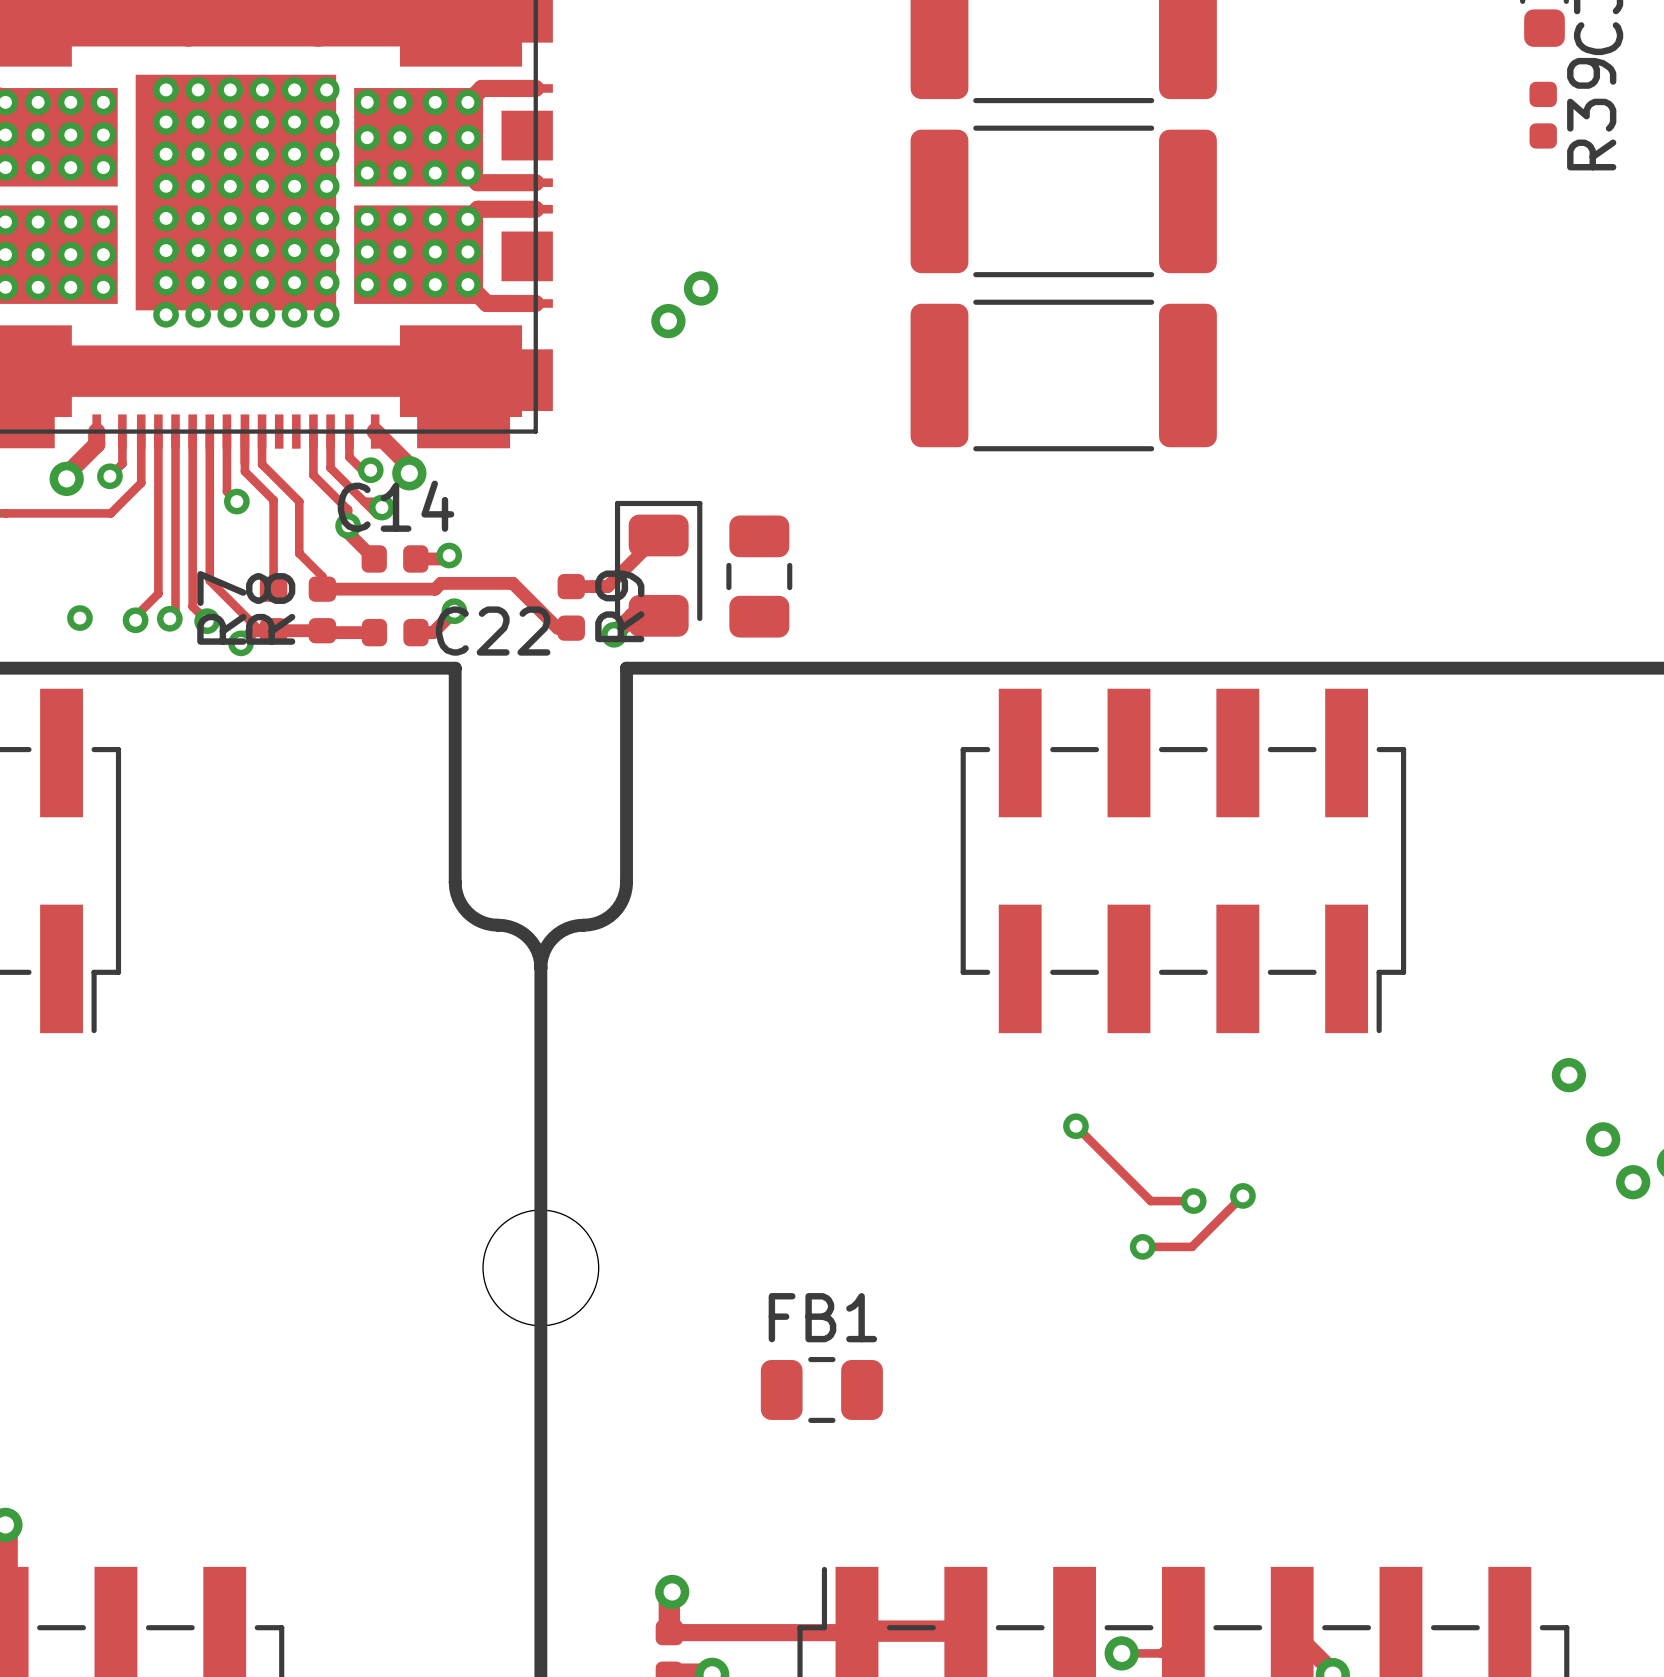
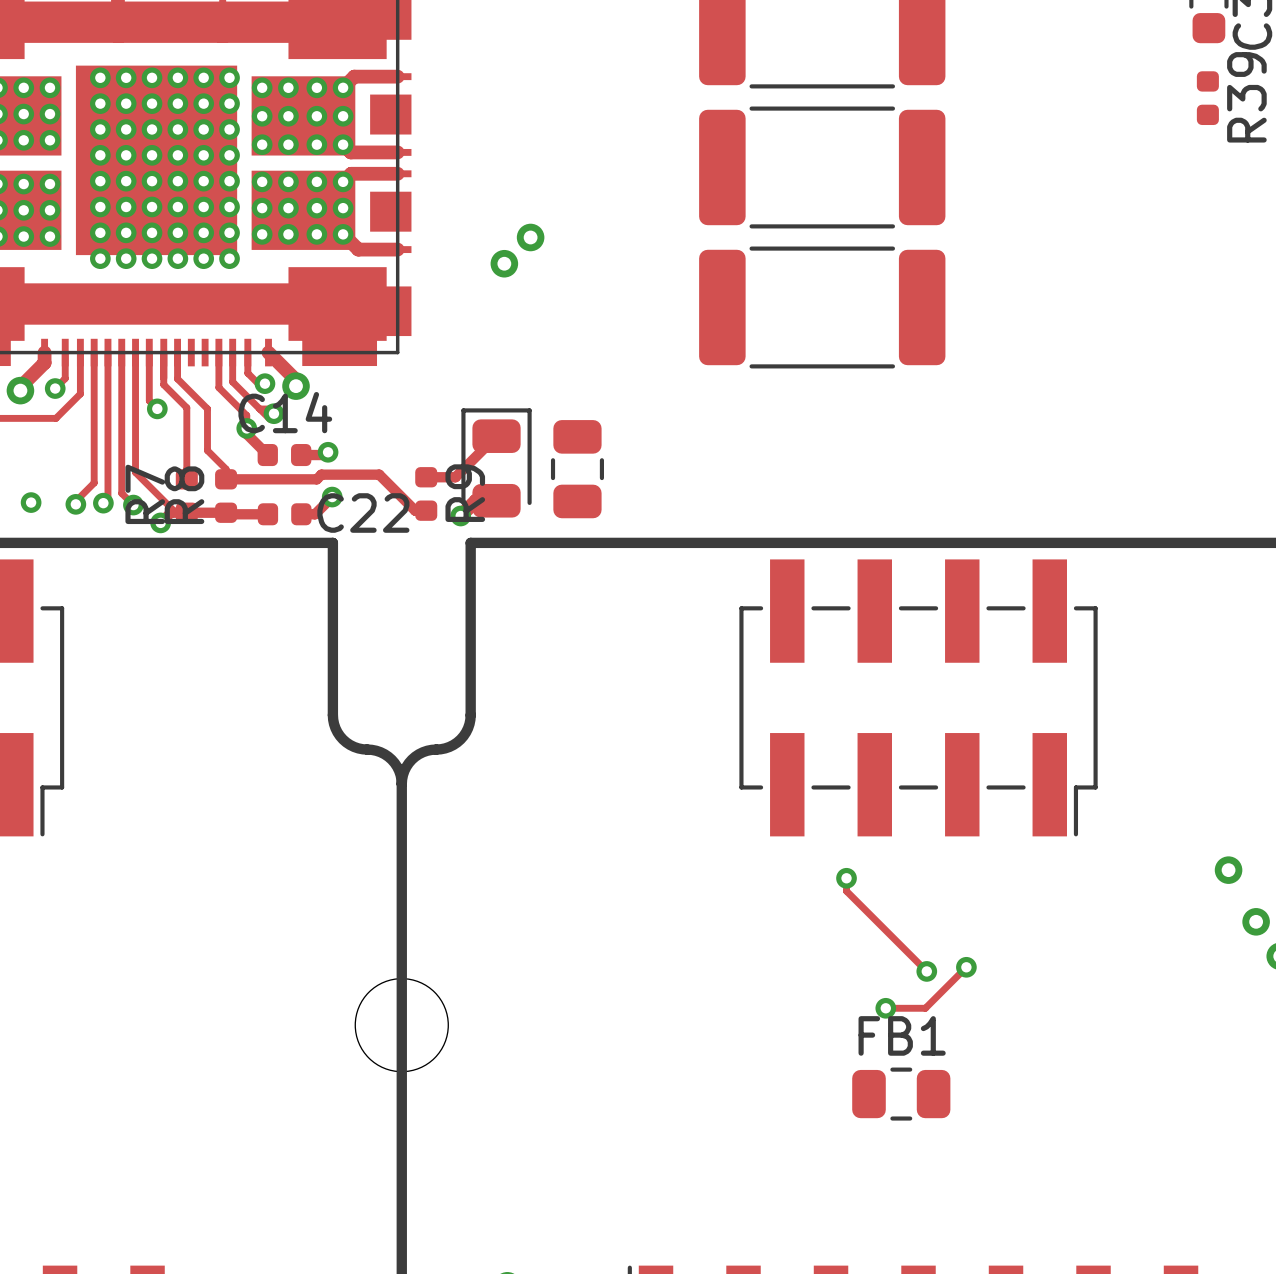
track: (1075, 1126) (1150, 1201) (1193, 1201) -> (846, 878) (846, 891) (926, 971)
via position: (1075, 1126) -> (846, 878)
FB1 position: (821, 1389) -> (901, 1094)

